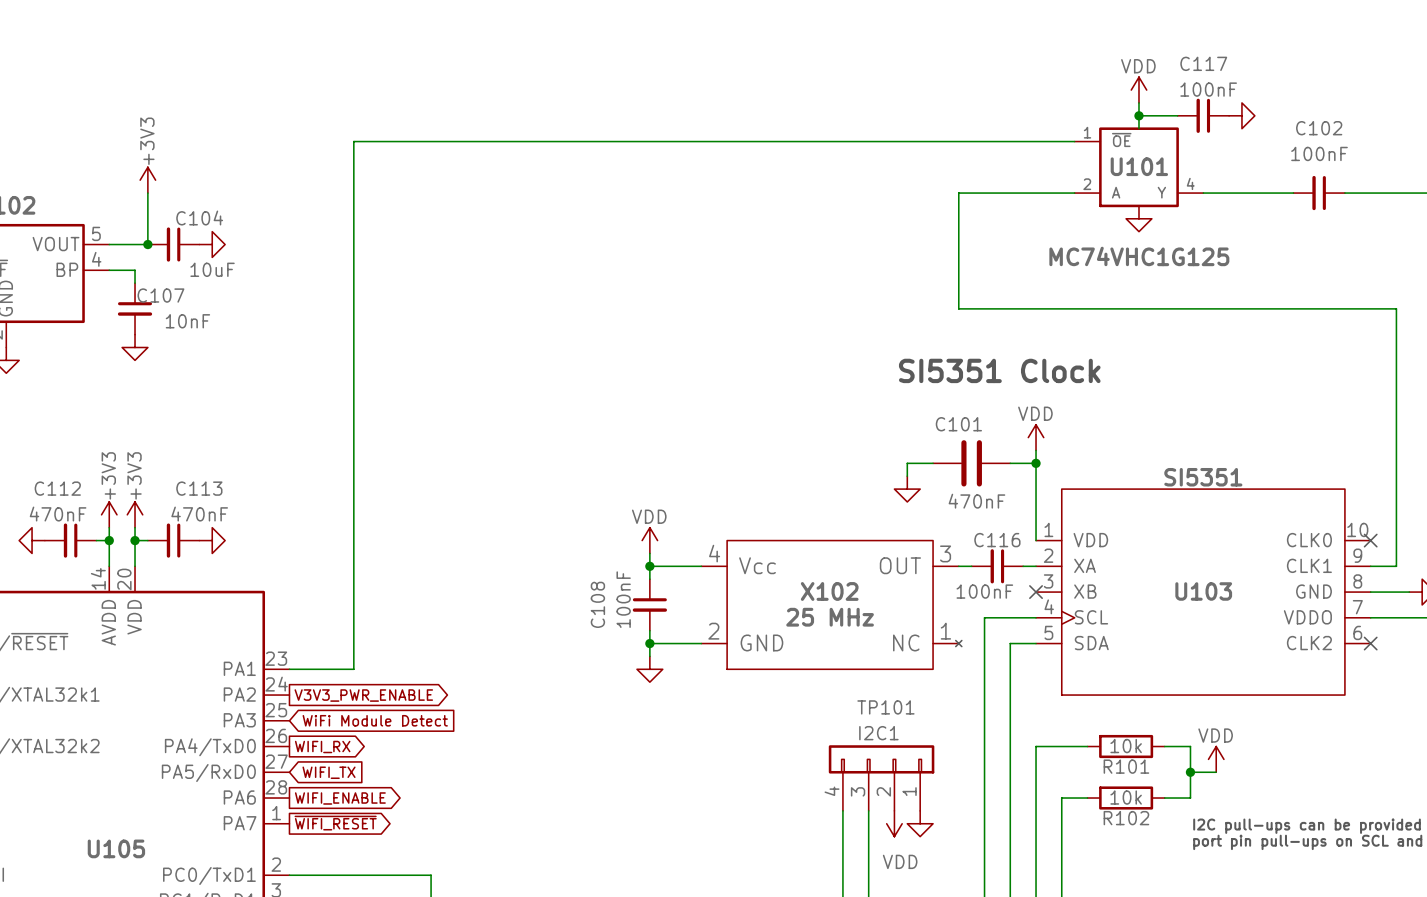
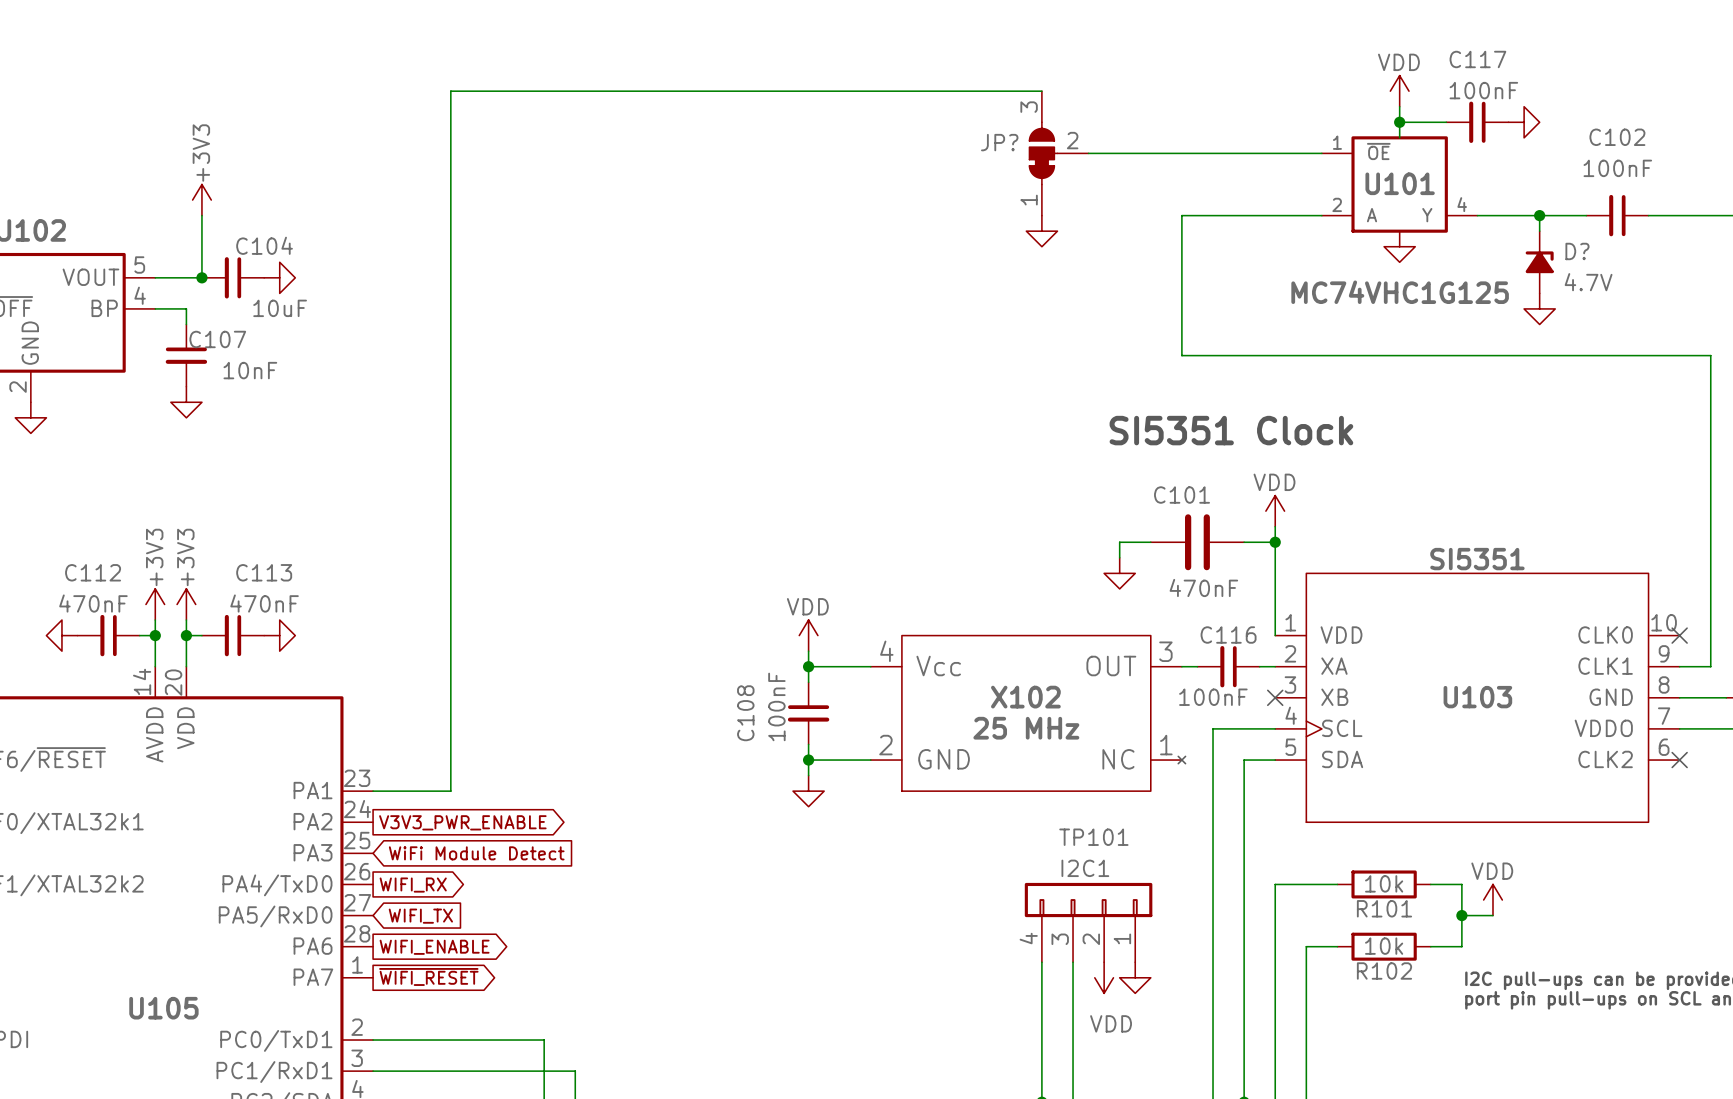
wire: (353, 141) (881, 141) -> (450, 153) (450, 91) (1041, 91)
JP?: none -> (1059, 153)
wire: none -> (1539, 215) (1539, 231)
junction: none -> (1539, 215)
power symbol: none -> (1041, 231)
D?: none -> 4.7V (1539, 262)
power symbol: none -> (1539, 308)

